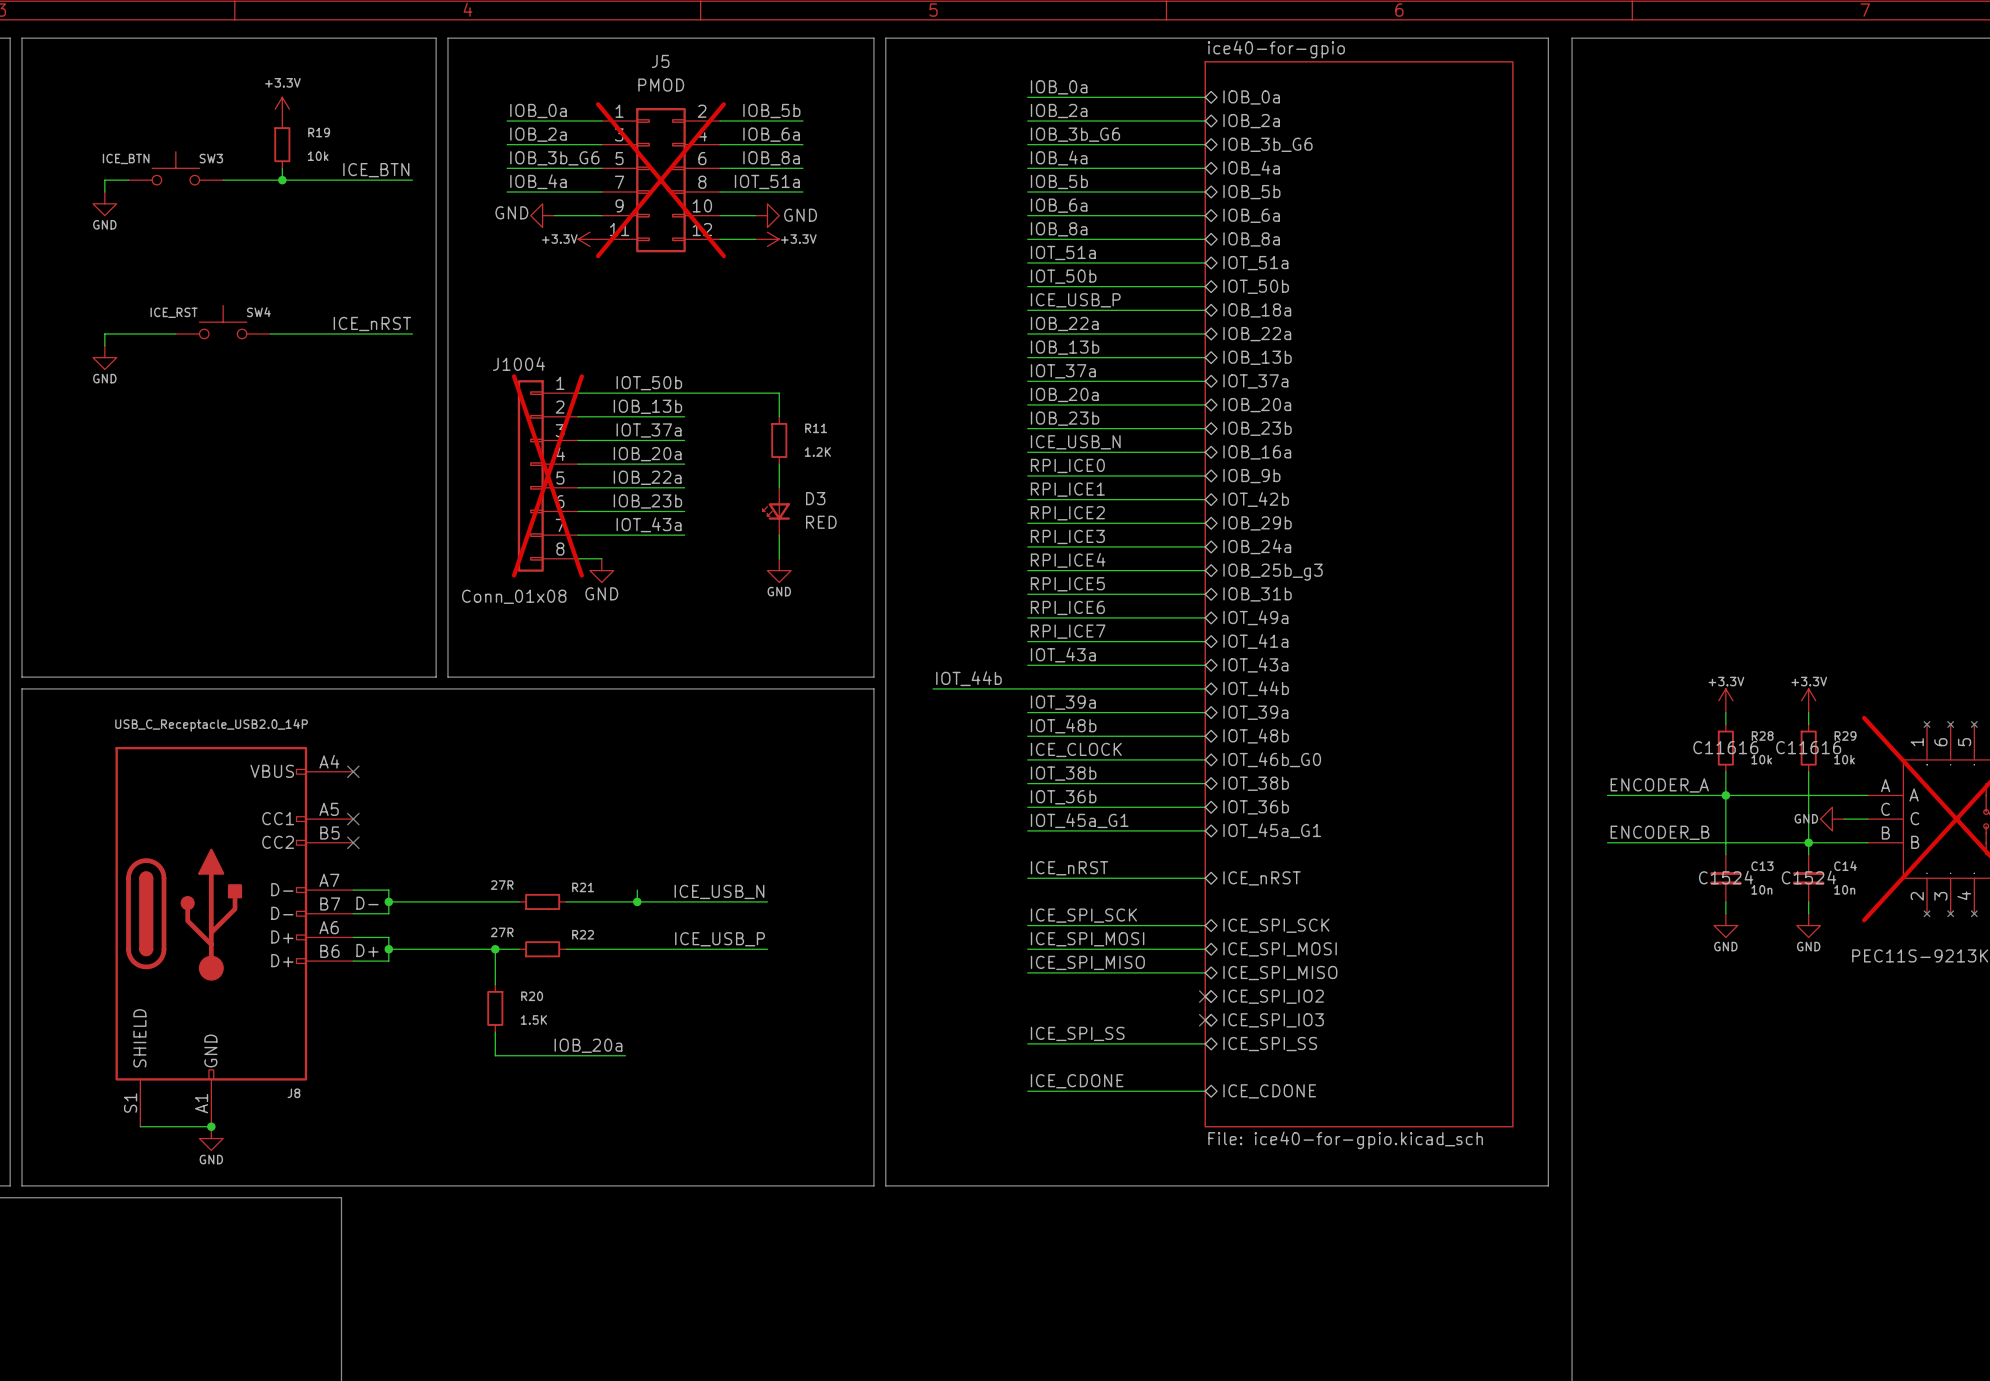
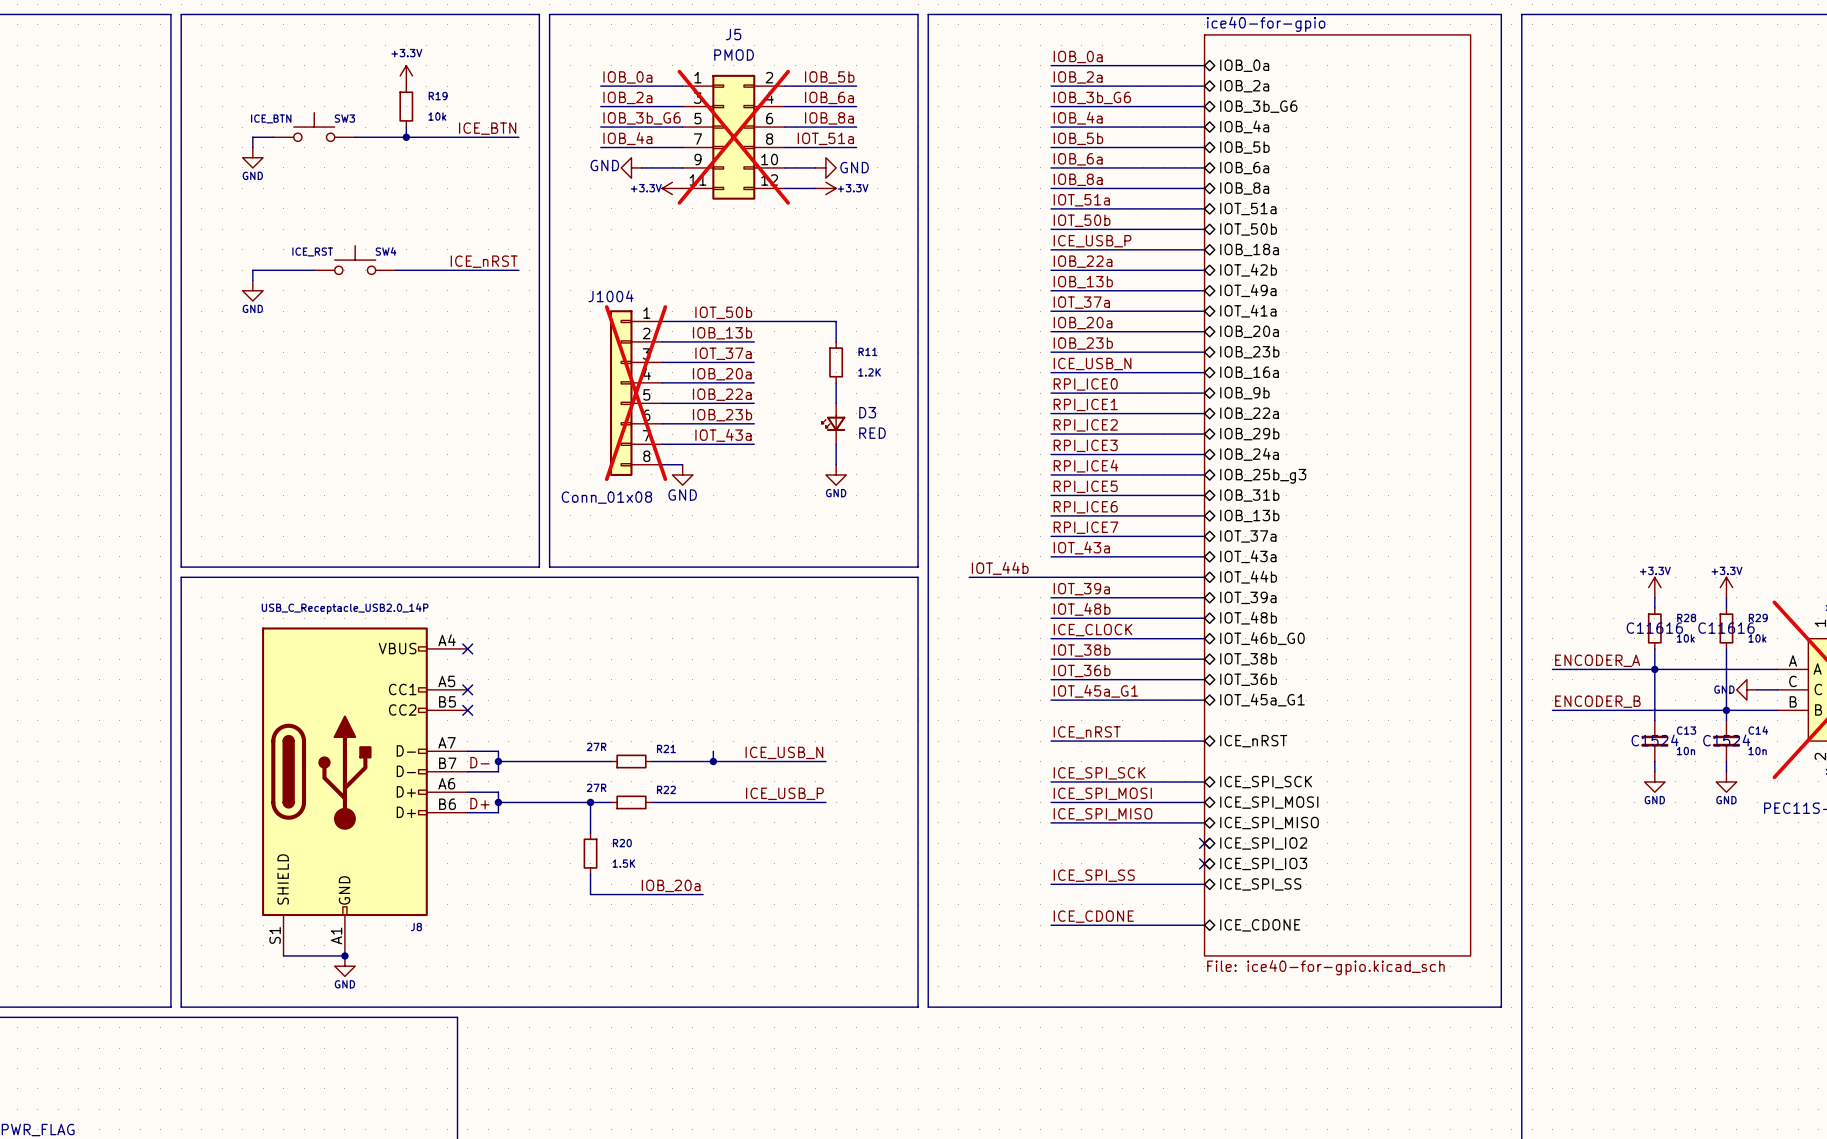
sheet pin: IOB_22a (1257, 334) -> IOT_42b (1248, 270)
sheet pin: IOB_13b (1257, 357) -> IOT_49a (1248, 290)
sheet pin: IOT_37a (1255, 381) -> IOT_41a (1248, 311)
sheet pin: IOT_42b (1256, 499) -> IOB_22a (1249, 413)
sheet pin: IOT_49a (1255, 617) -> IOB_13b (1249, 516)
sheet pin: IOT_41a (1255, 641) -> IOT_37a (1248, 536)

